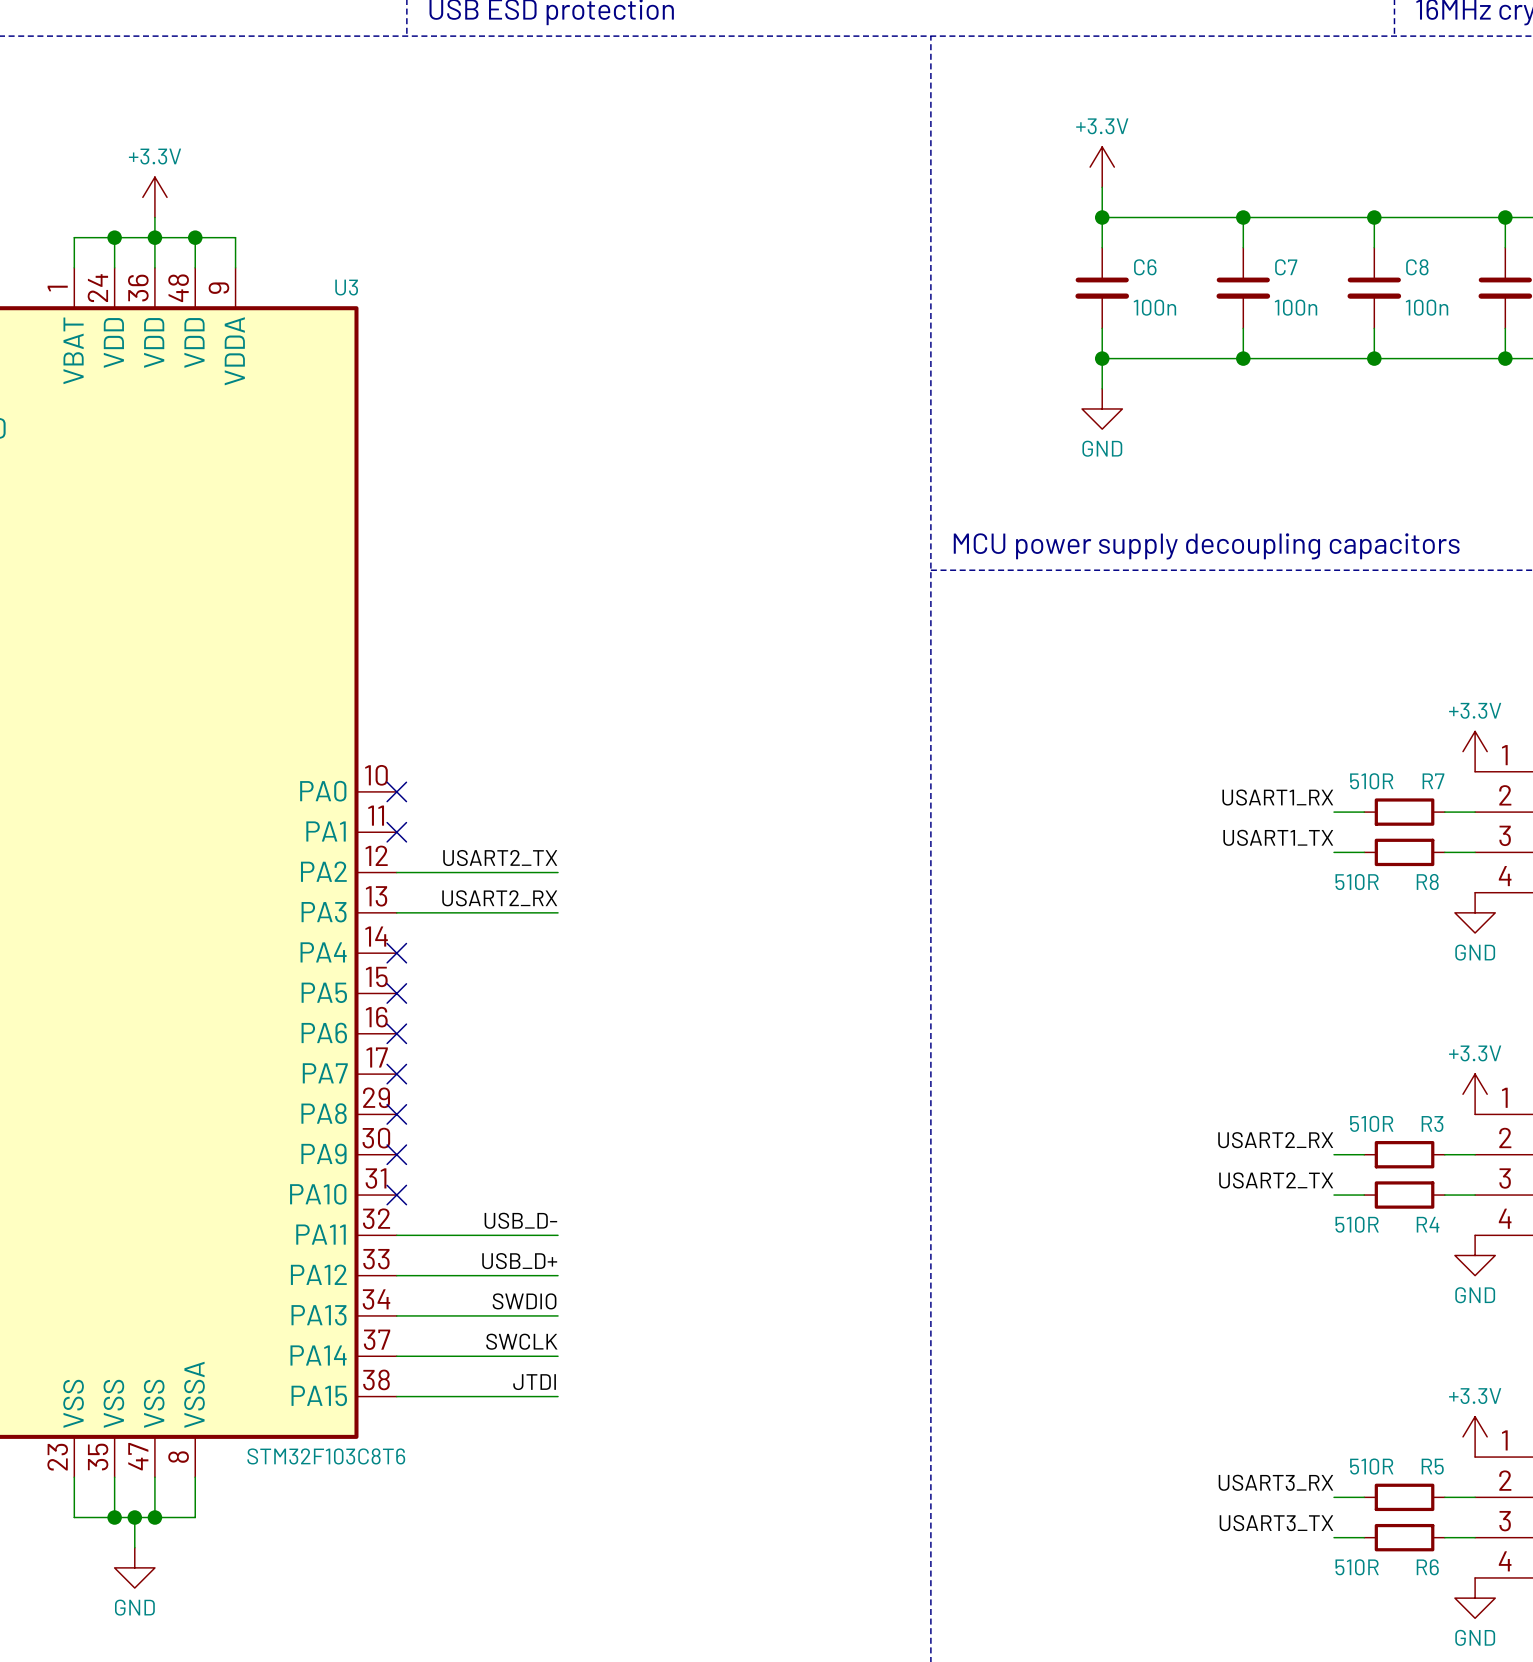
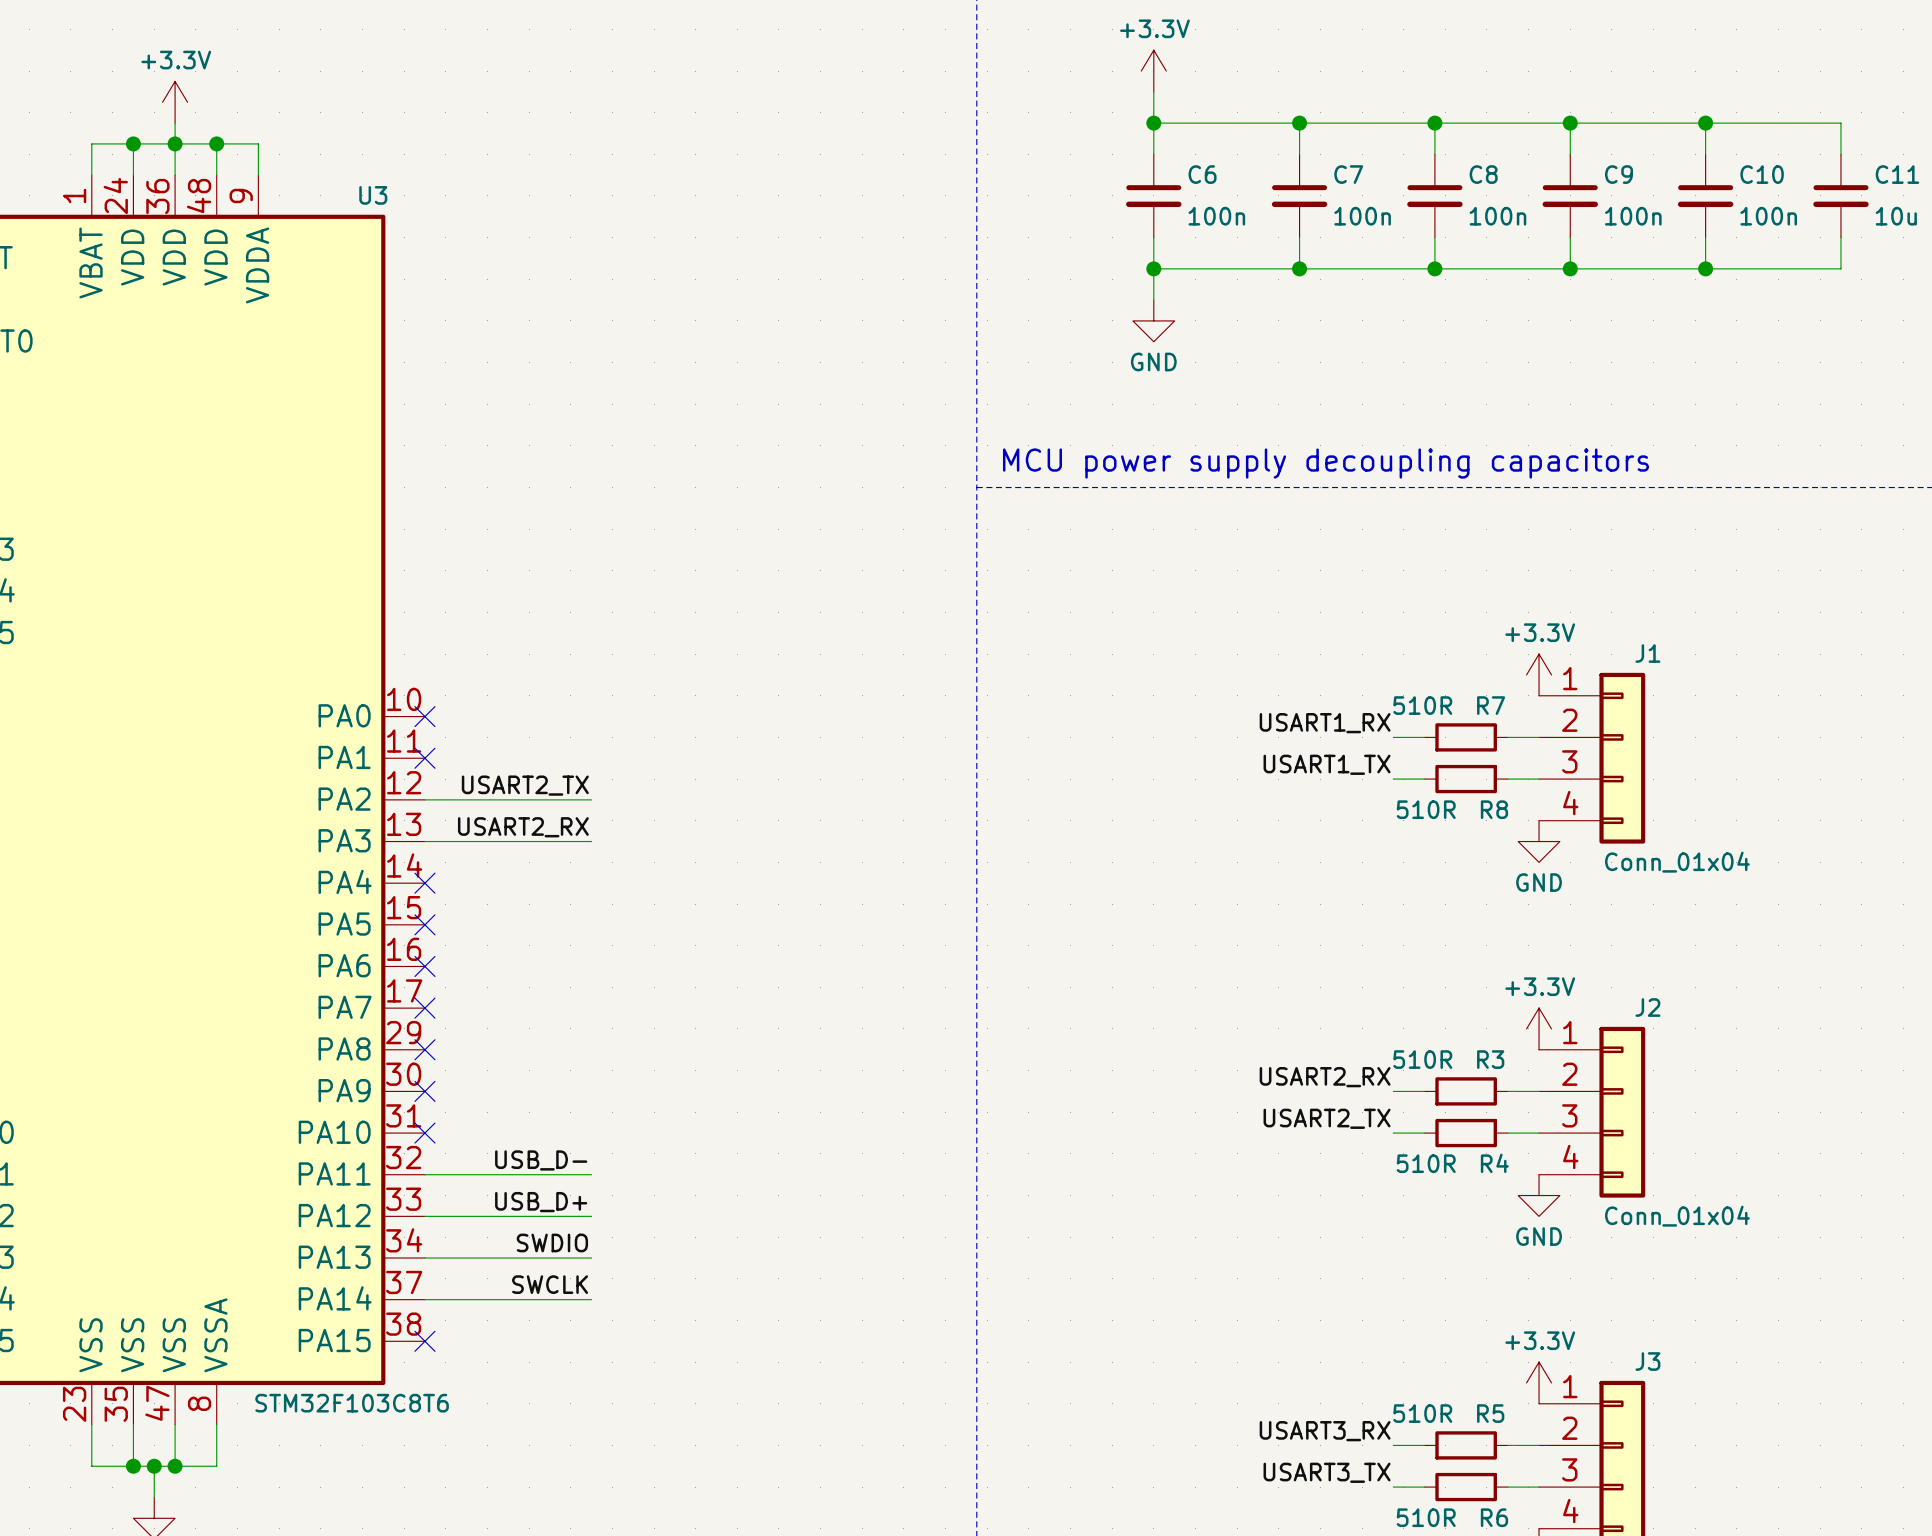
label: JTDI (534, 1382) -> none
wire: (396, 1396) (558, 1396) -> none
no-connect mark: none -> (424, 1341)

